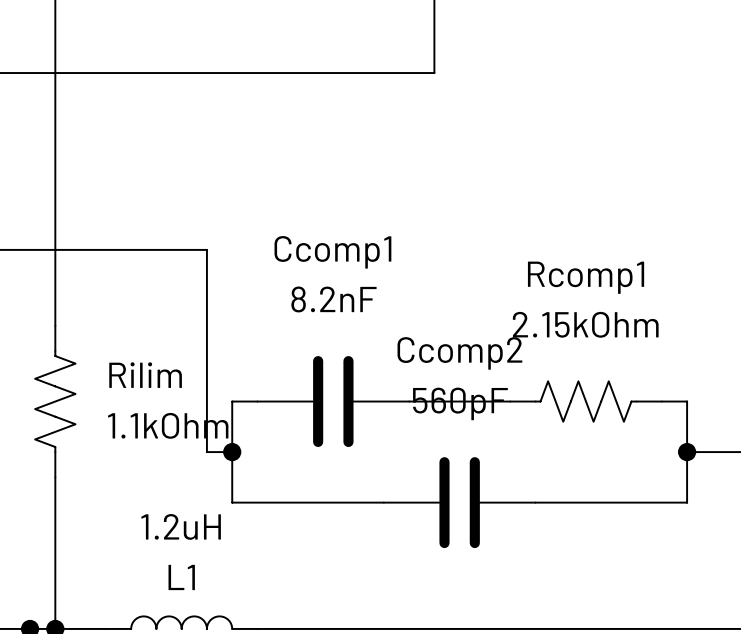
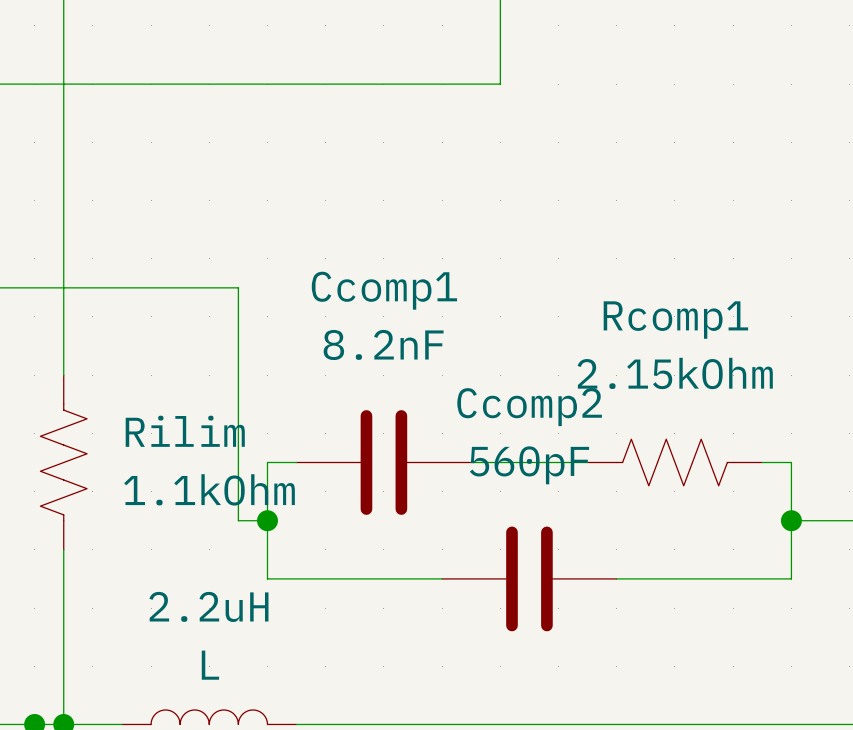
1.2uH name: 1.2uH (181, 526) -> 2.2uH (208, 606)
1.2uH value: L1 (181, 577) -> L (210, 665)

